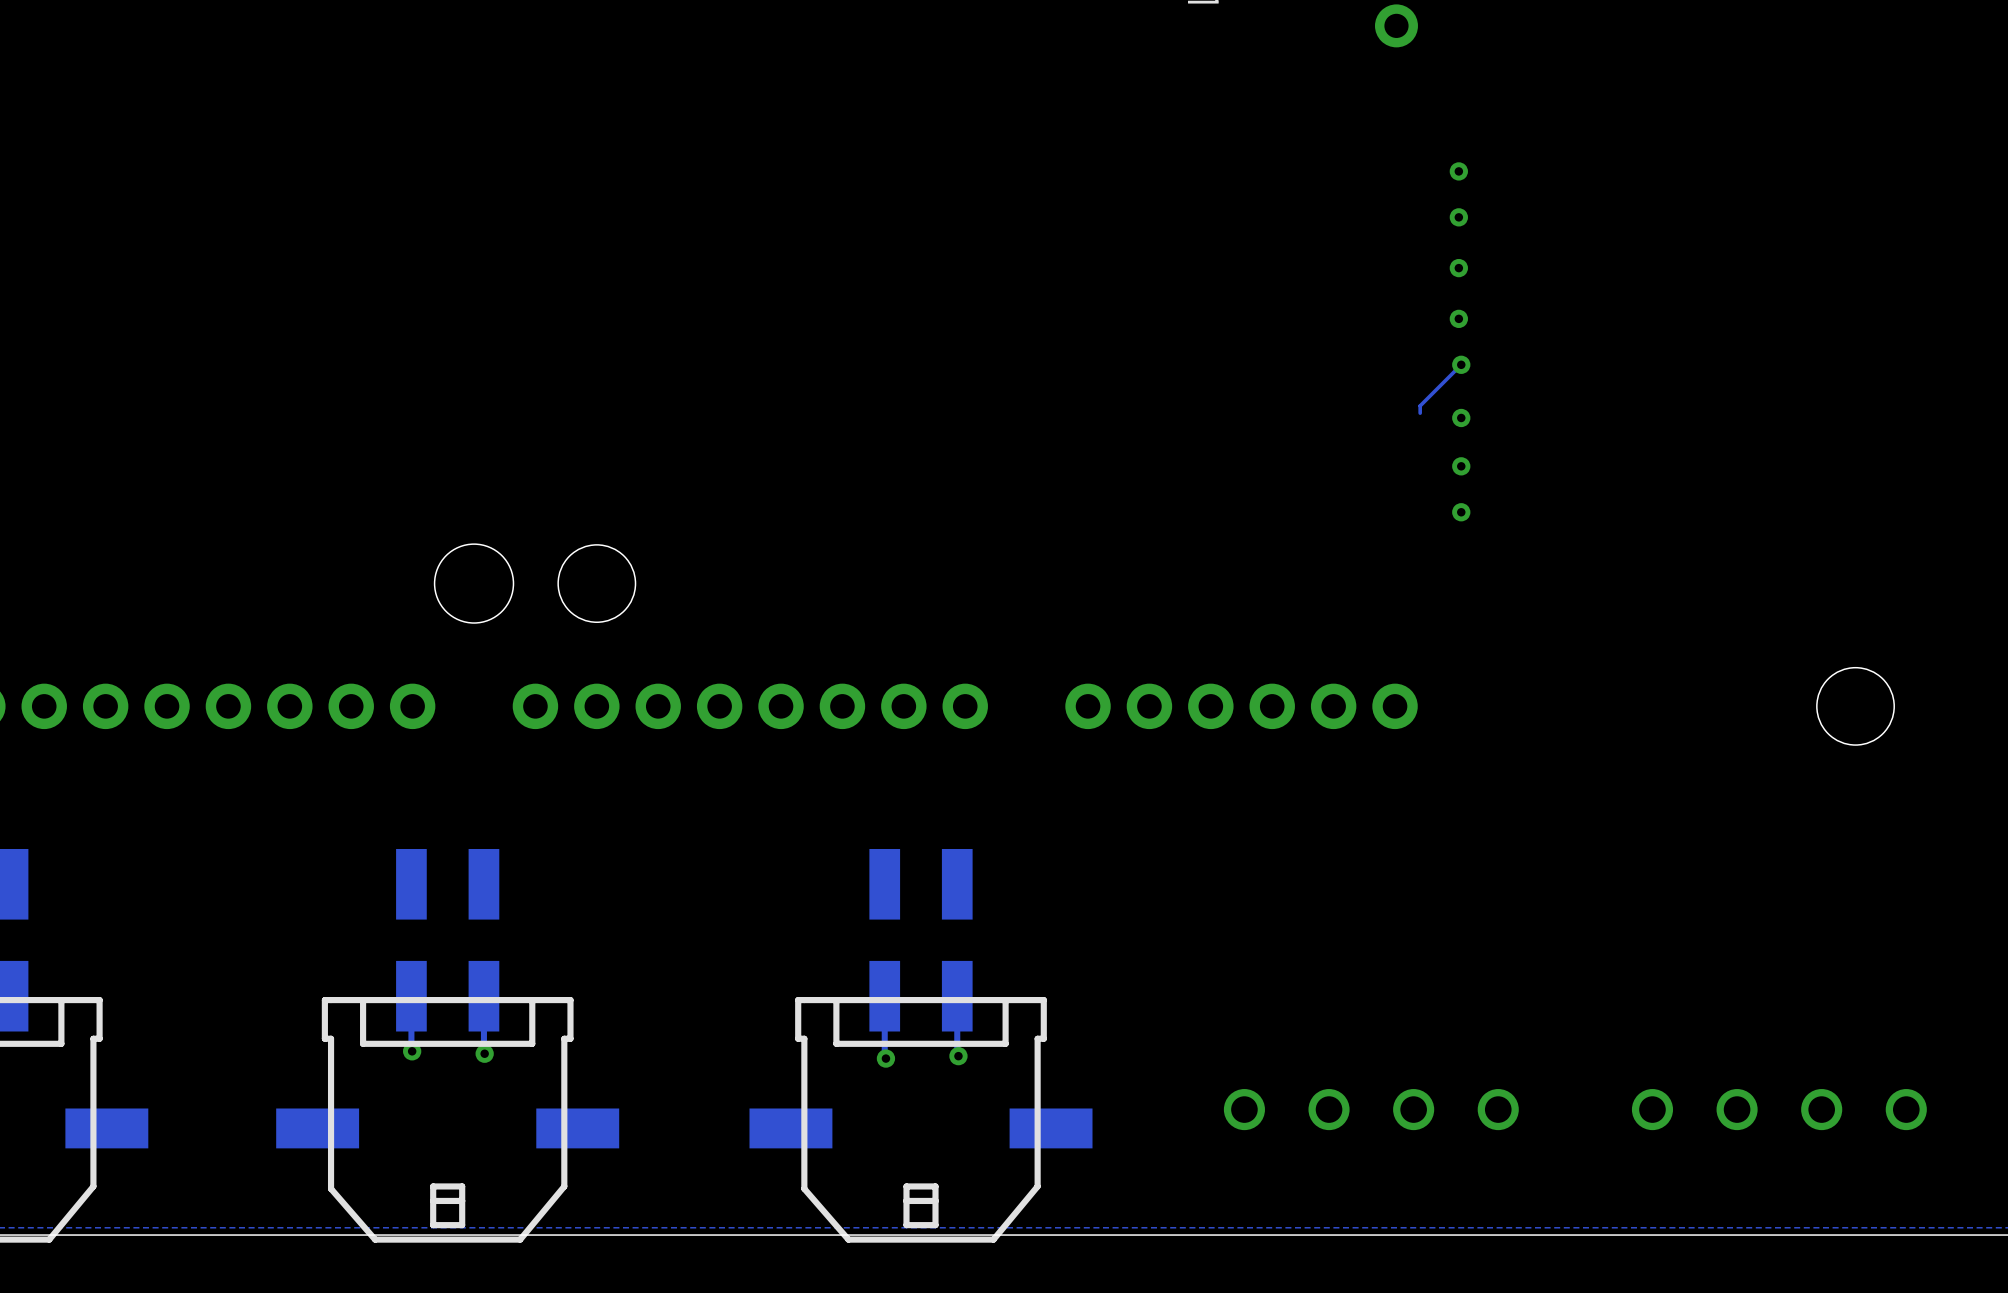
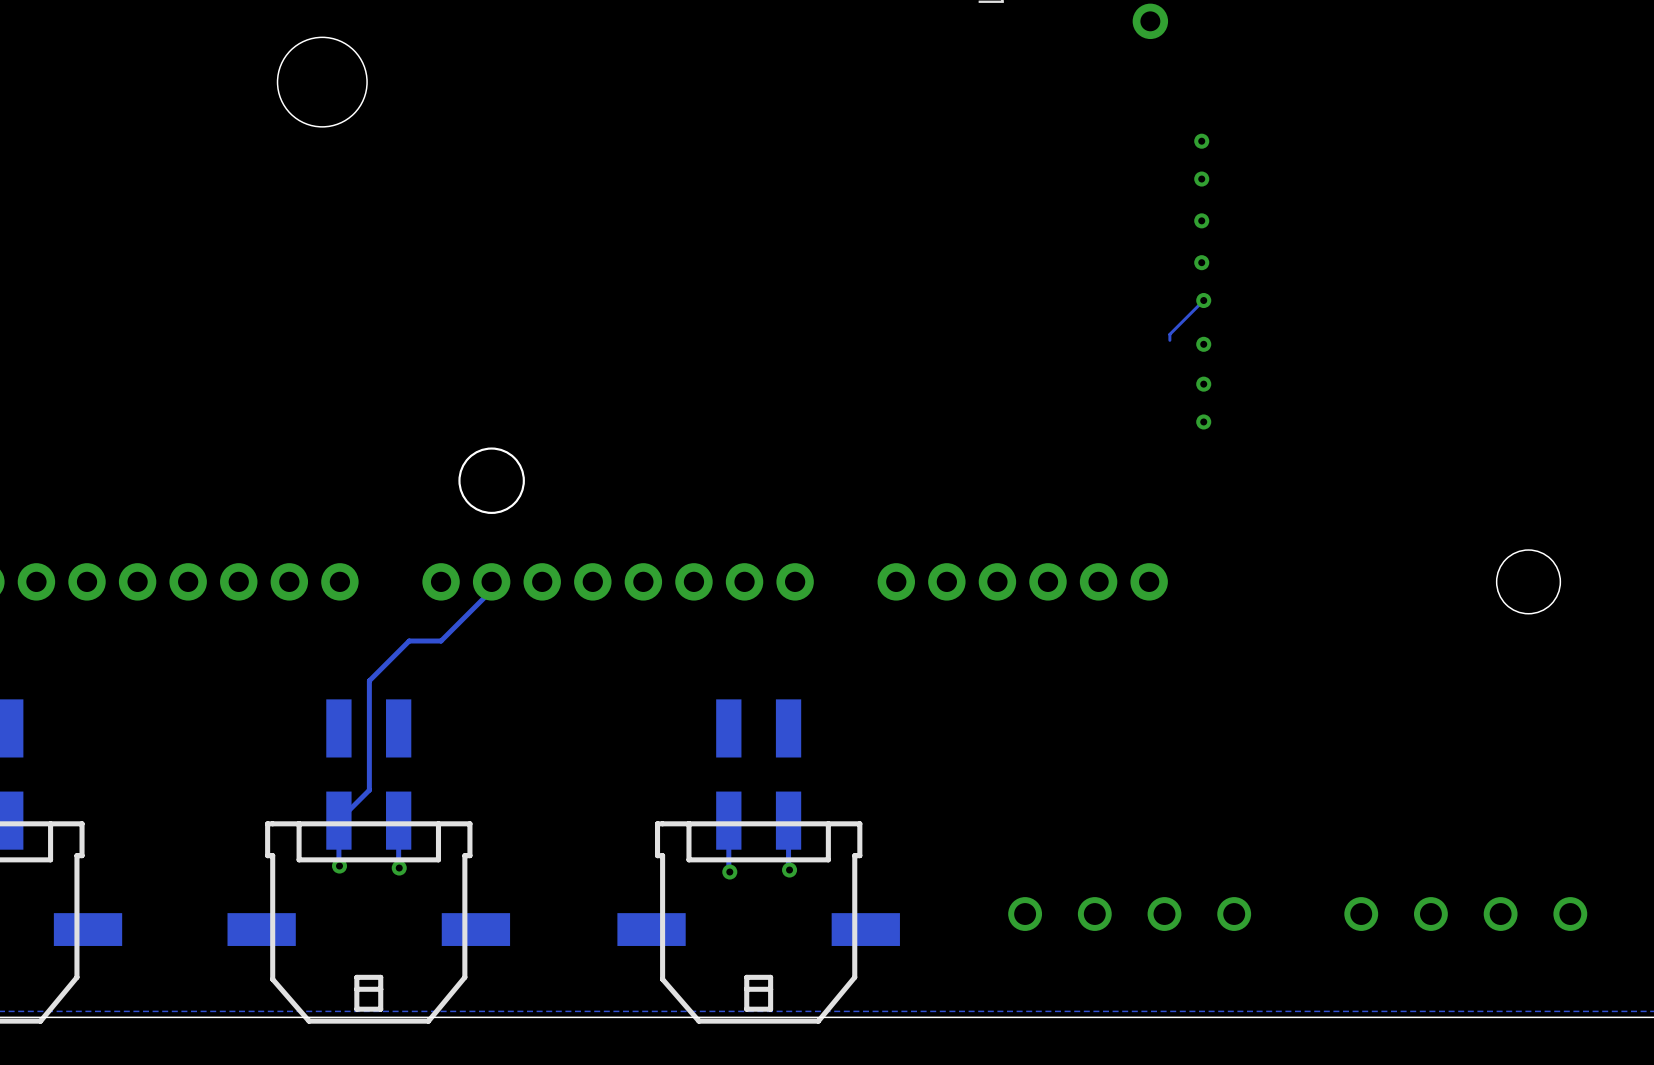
round board edge: none -> [277, 37, 368, 127]
round board edge position: (474, 583) -> (491, 480)
track: none -> (491, 581) (491, 590) (441, 641) (409, 641) (369, 680) (369, 790) (338, 820)

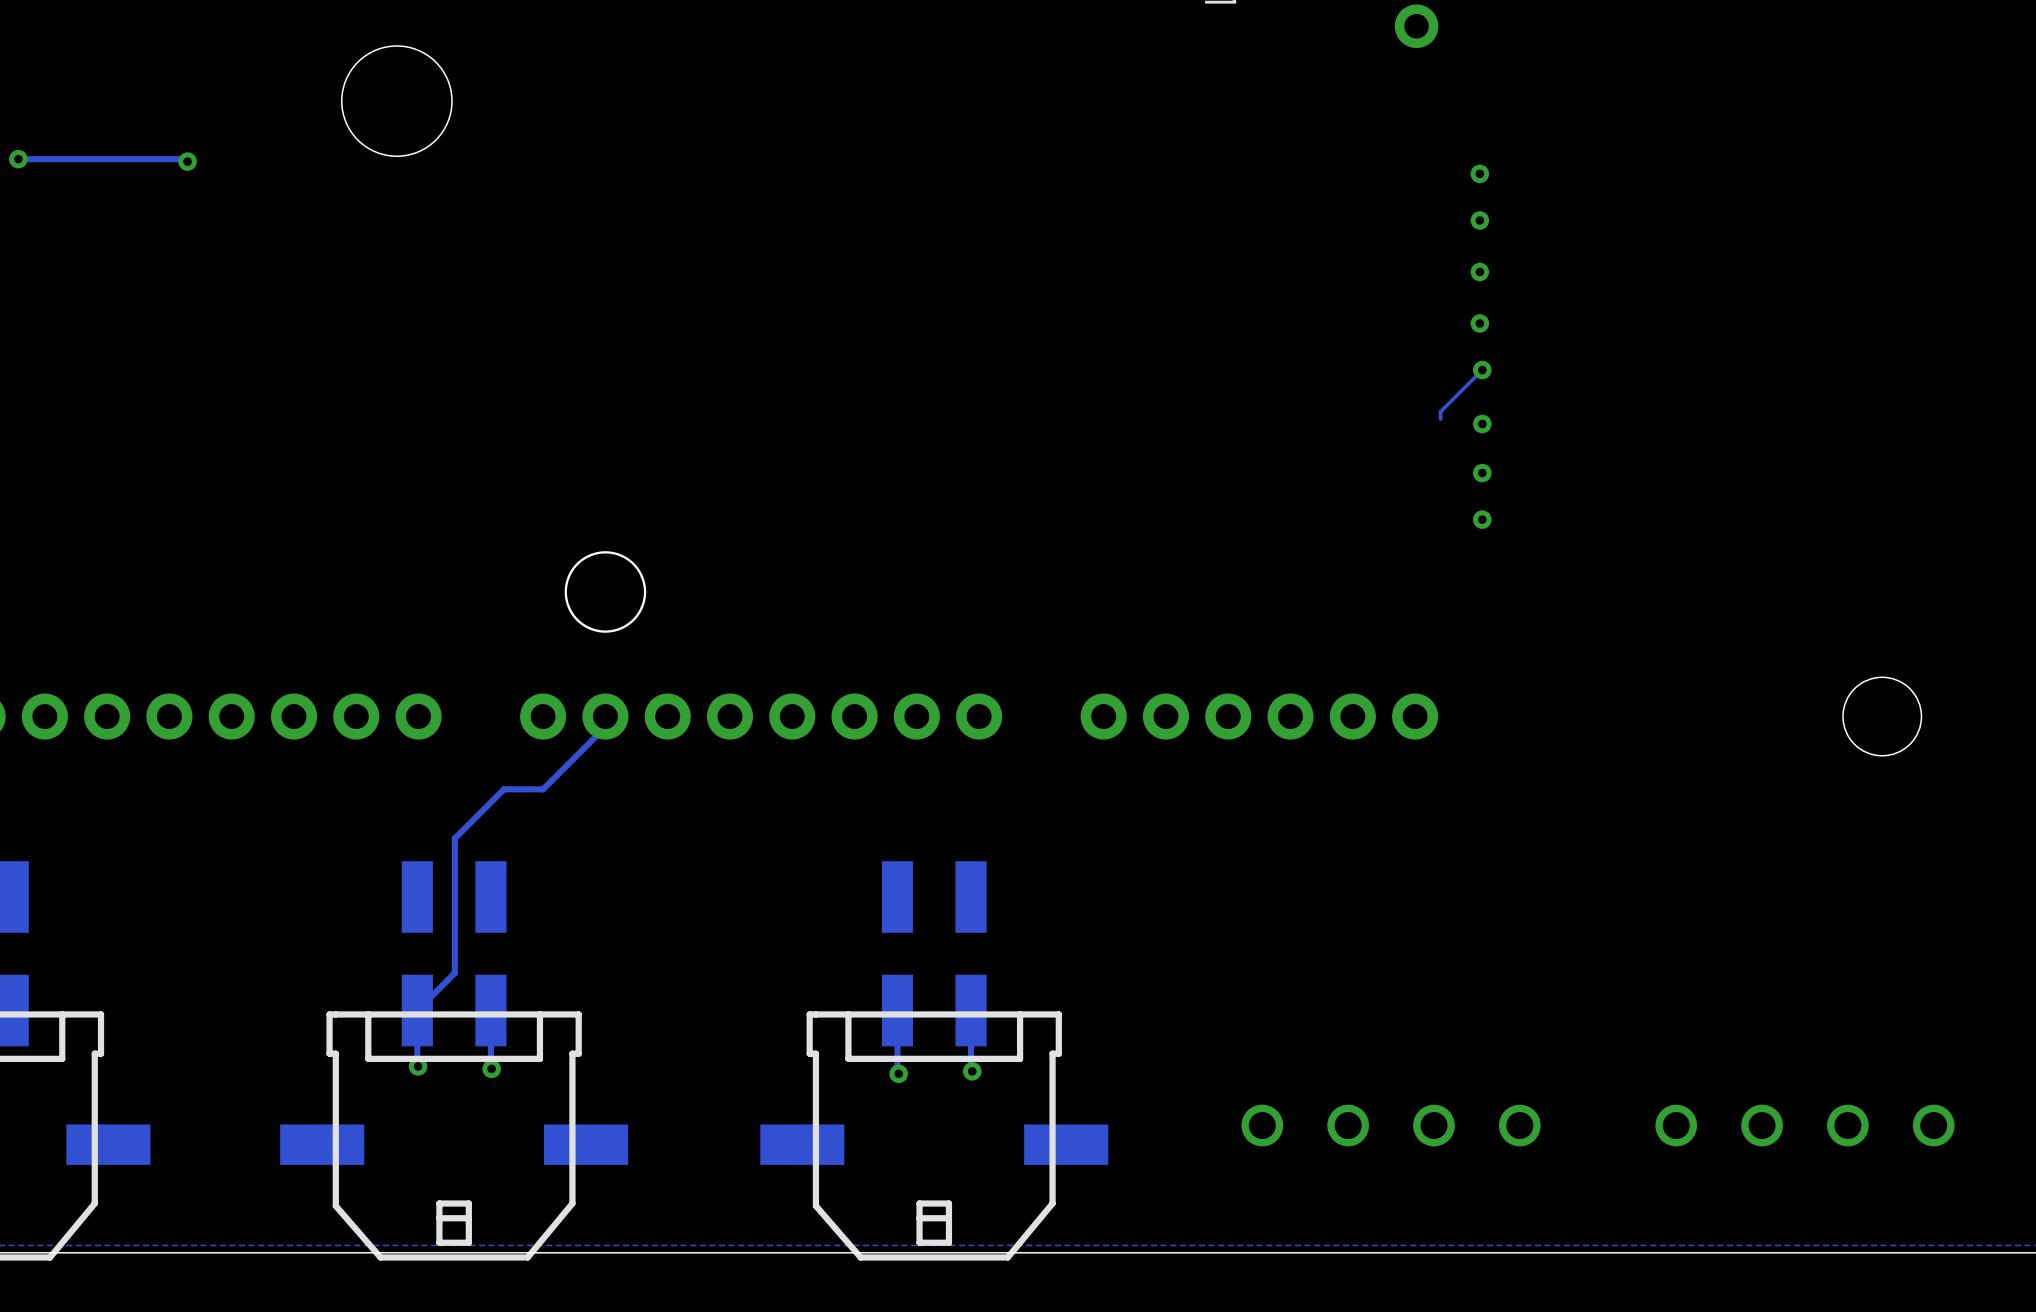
track: none -> (18, 159) (185, 159) (187, 161)
via: none -> (18, 159)
via: none -> (187, 161)

